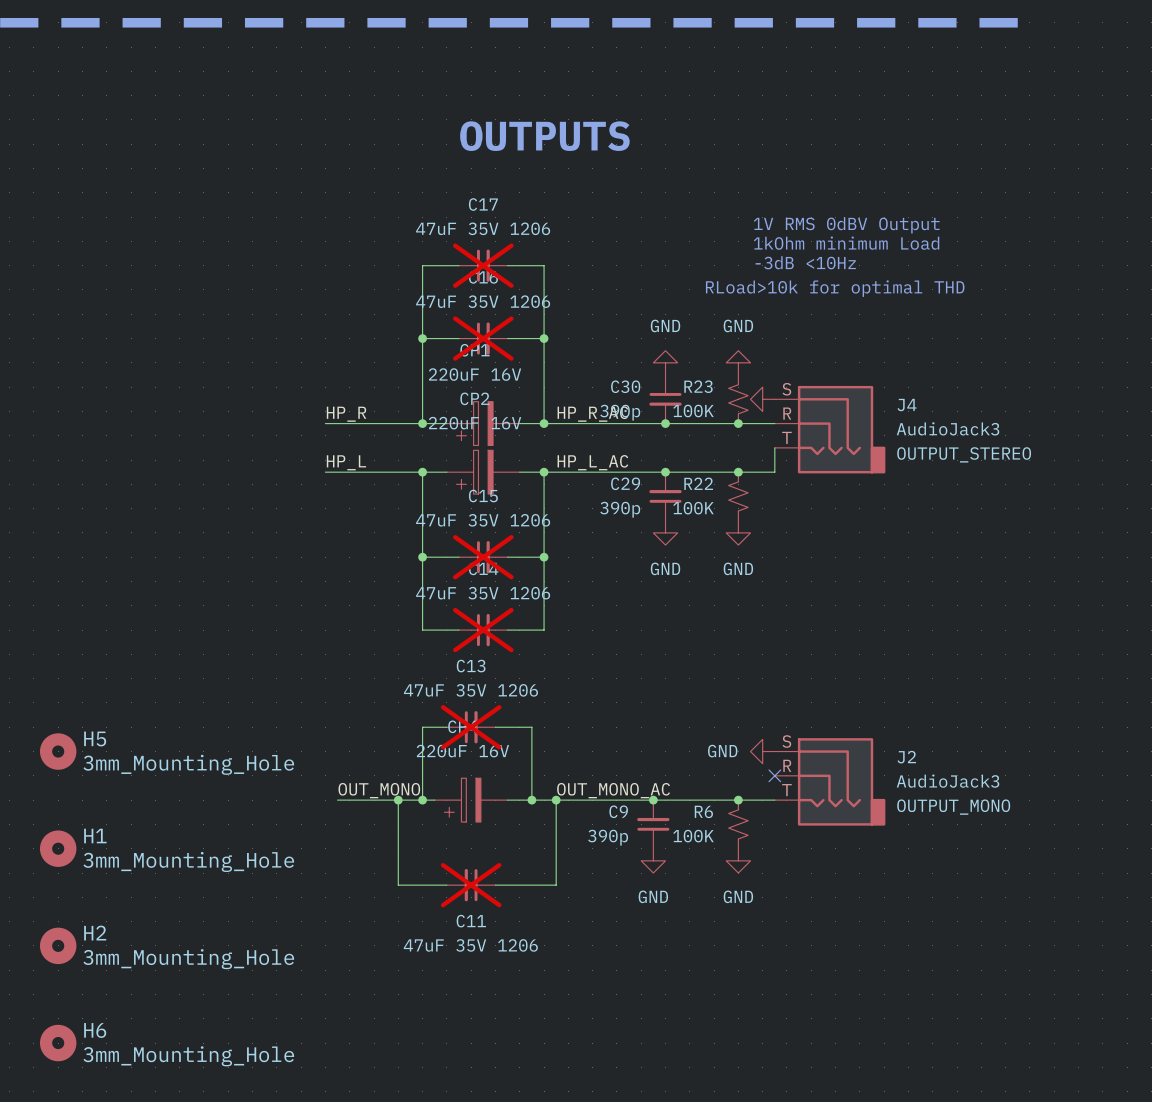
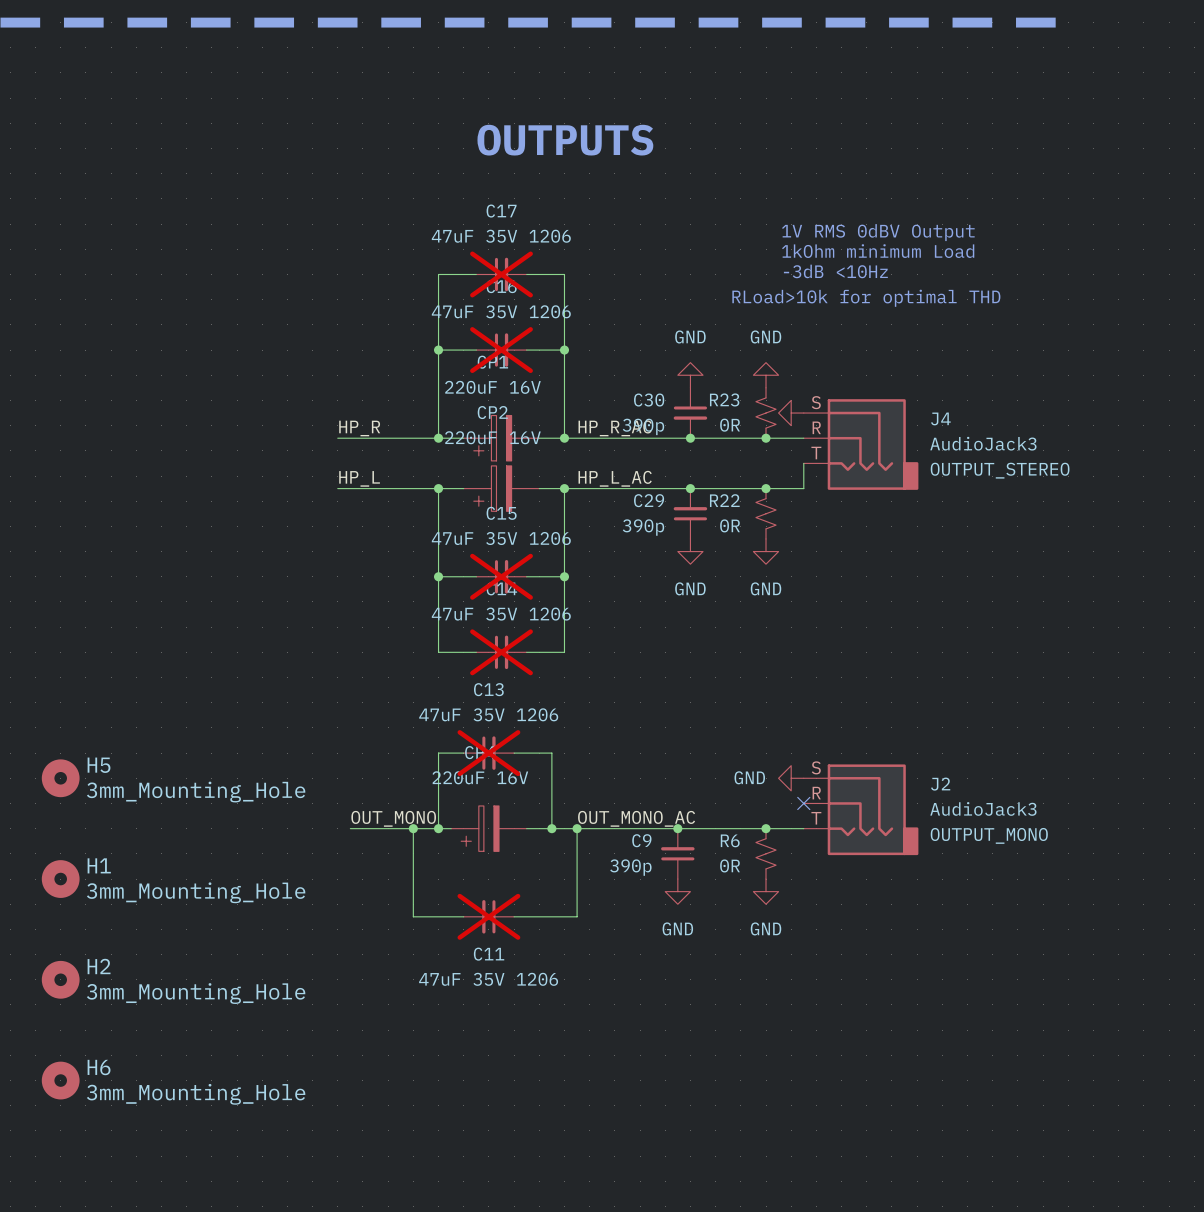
R23 value: 100K (693, 410) -> 0R (730, 425)
R22 value: 100K (693, 508) -> 0R (730, 525)
R6 value: 100K (693, 836) -> 0R (730, 865)

